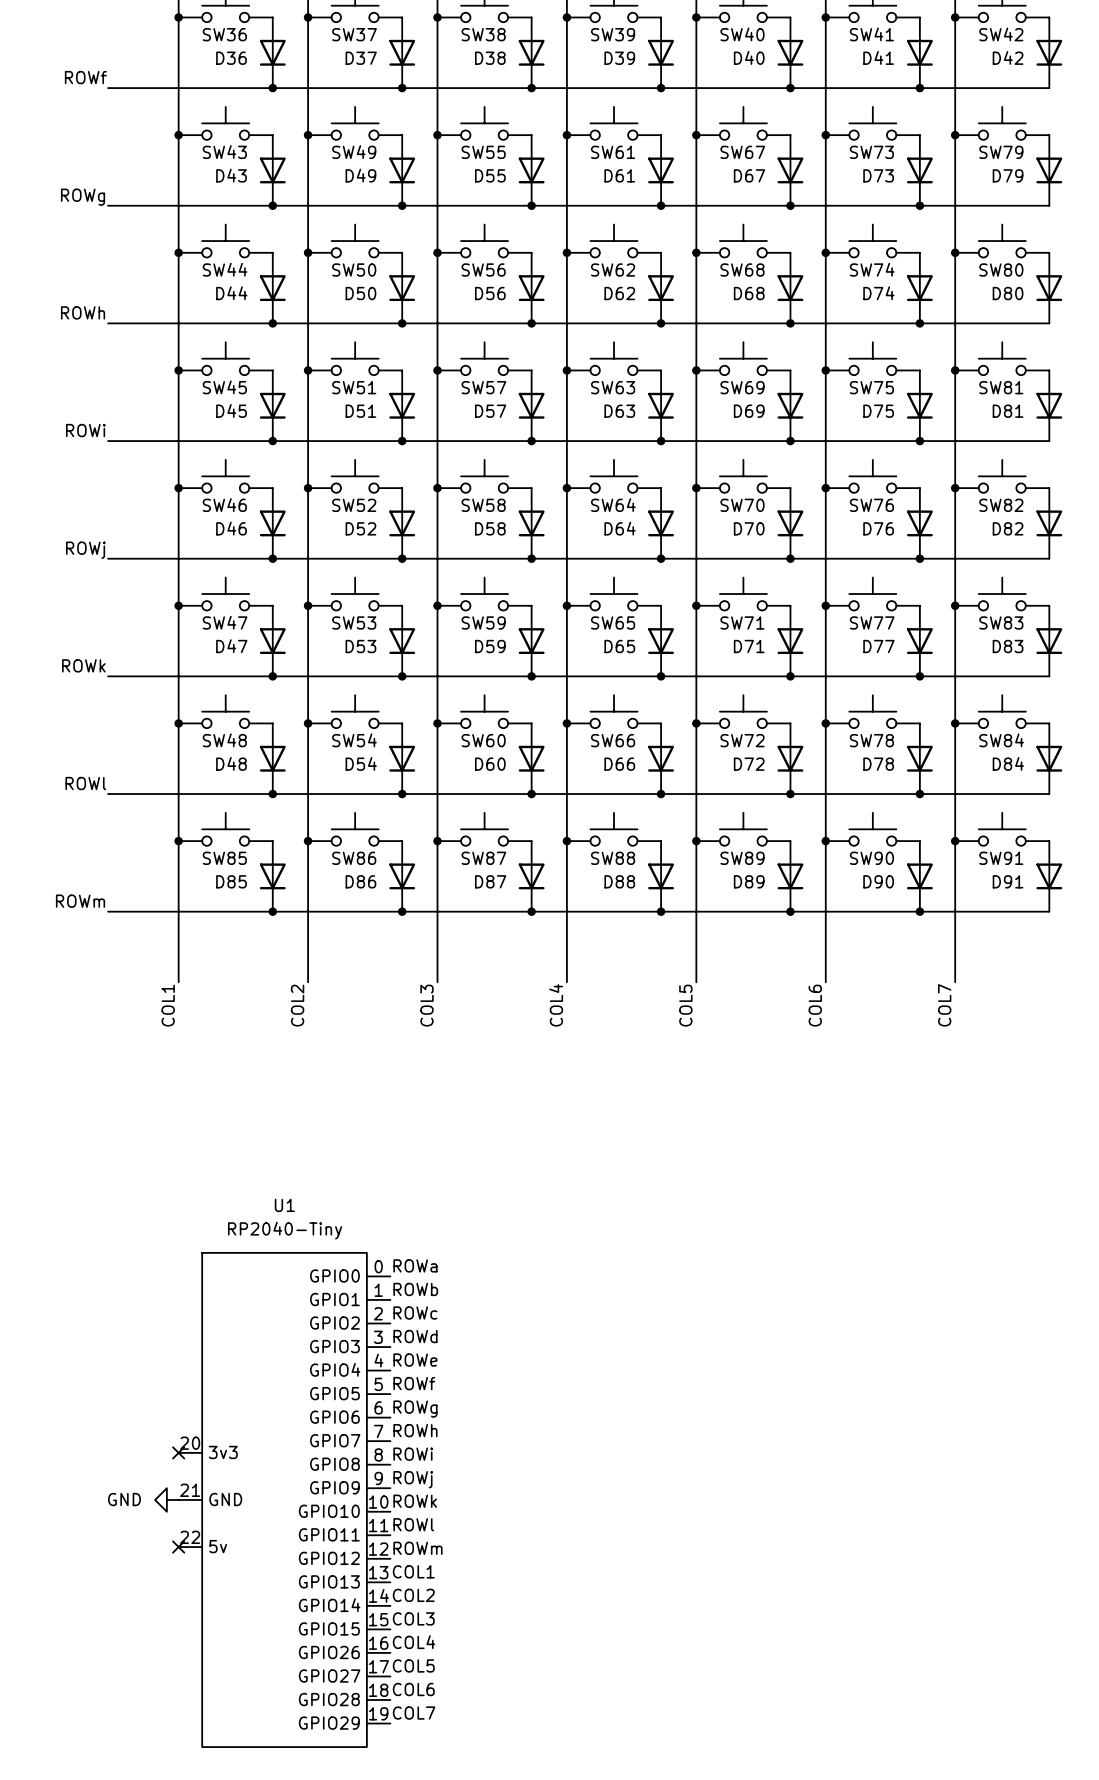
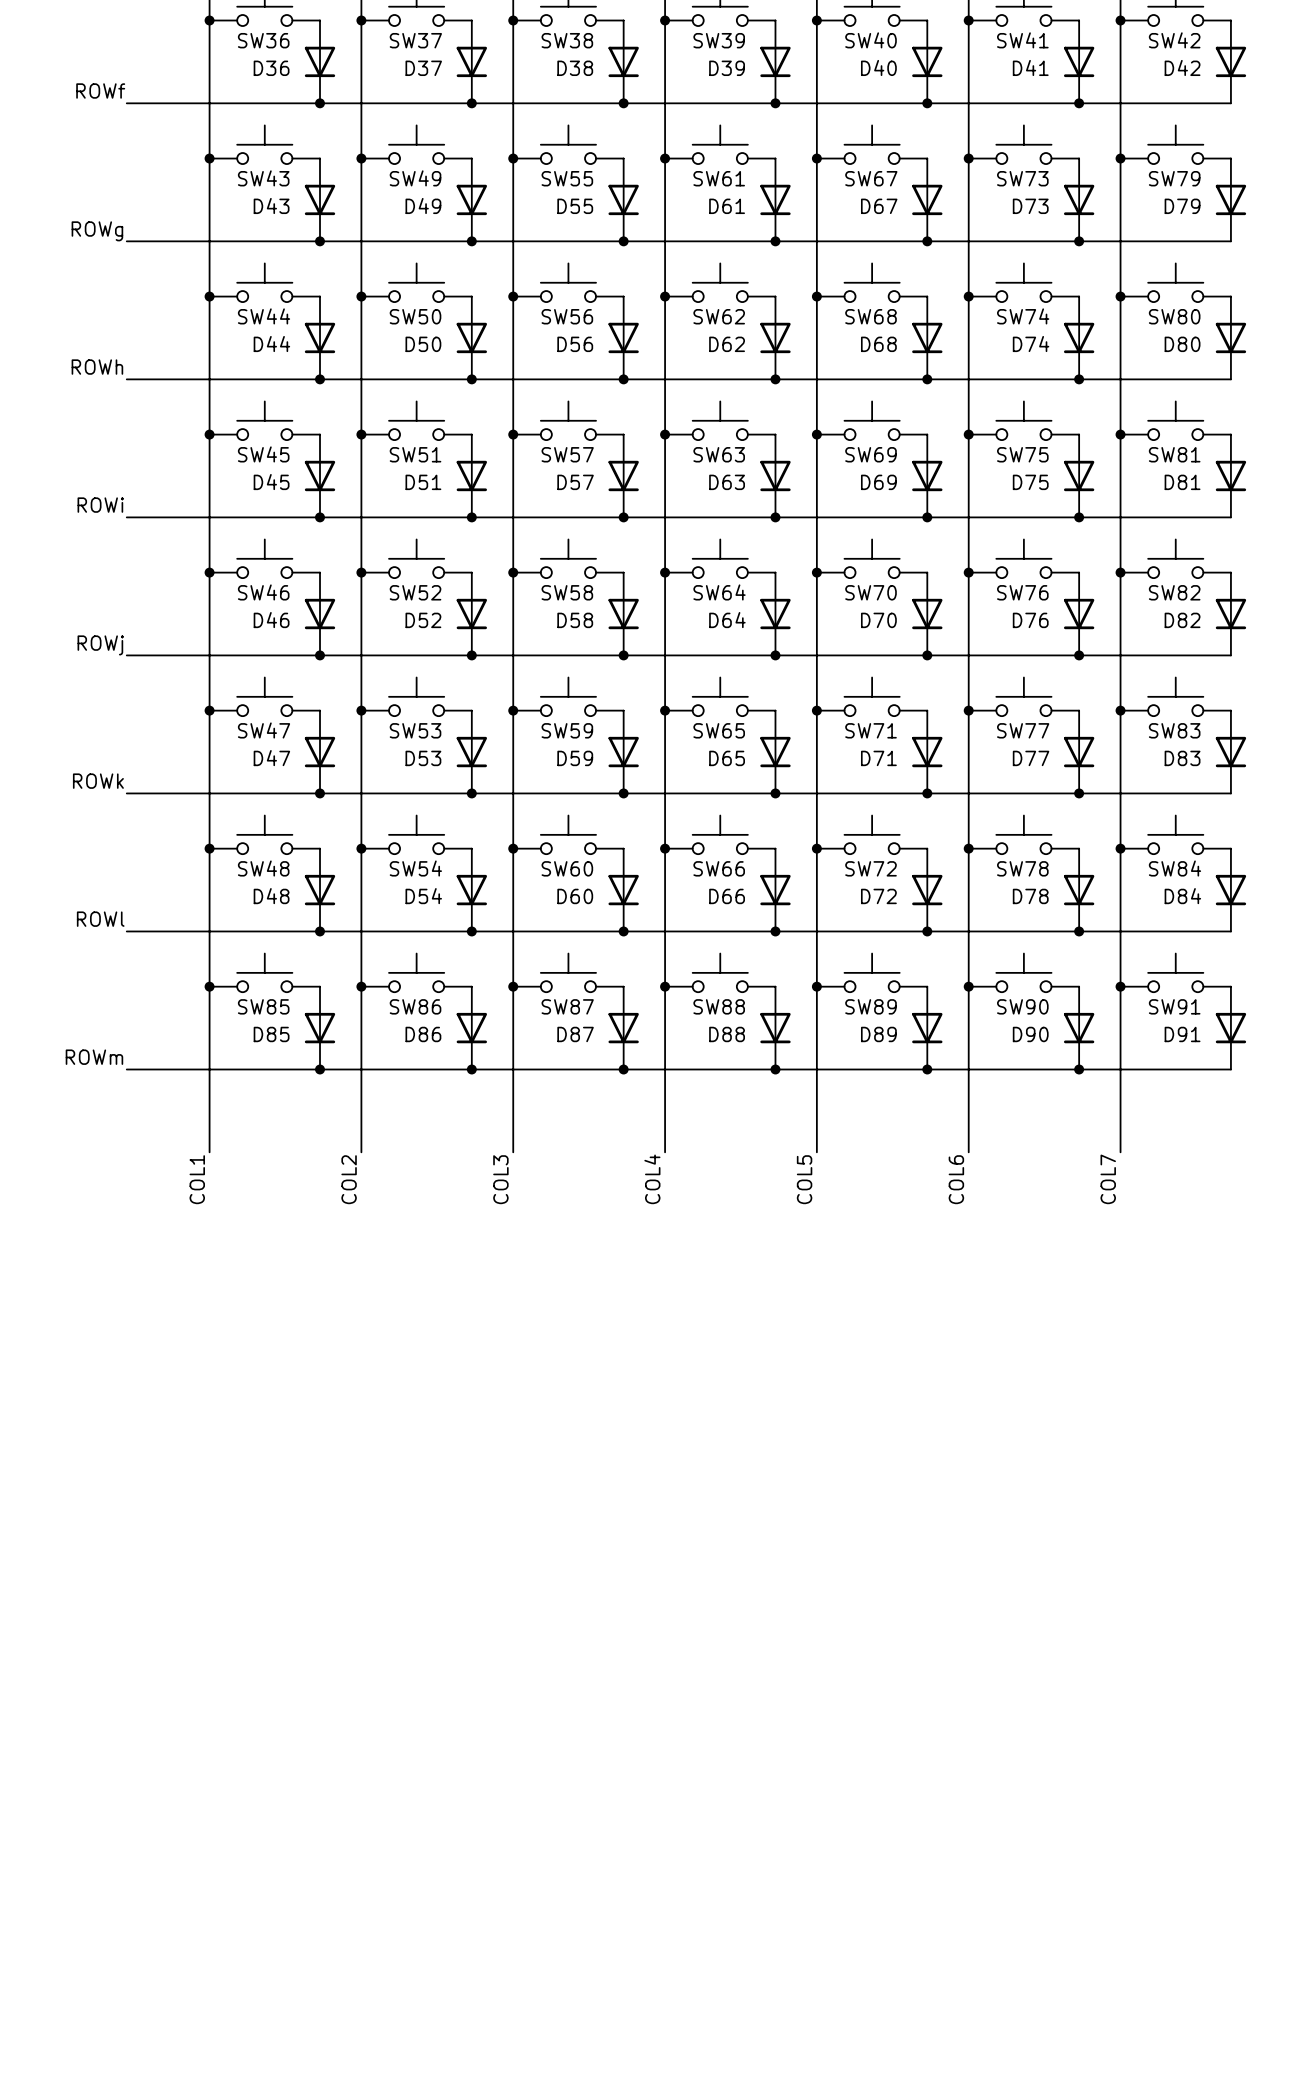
label: ROWa (415, 1265) -> none
label: ROWb (415, 1289) -> none
label: ROWc (415, 1312) -> none
label: ROWd (415, 1336) -> none
label: ROWe (415, 1360) -> none
label: ROWf (414, 1383) -> none
label: ROWg (415, 1409) -> none
label: ROWh (415, 1430) -> none
no-connect mark: (178, 1452) -> none
label: ROWi (413, 1454) -> none
label: ROWj (413, 1479) -> none
power symbol: GND (166, 1499) -> none
U1: RP2040-Tiny (284, 1499) -> none
label: ROWk (415, 1501) -> none
label: ROWl (413, 1524) -> none
no-connect mark: (178, 1547) -> none
label: ROWm (417, 1548) -> none
label: COL1 (413, 1571) -> none
label: COL2 (413, 1595) -> none
label: COL3 (413, 1618) -> none
label: COL4 (414, 1642) -> none
label: COL5 (413, 1665) -> none
label: COL6 (413, 1689) -> none
label: COL7 (414, 1713) -> none

